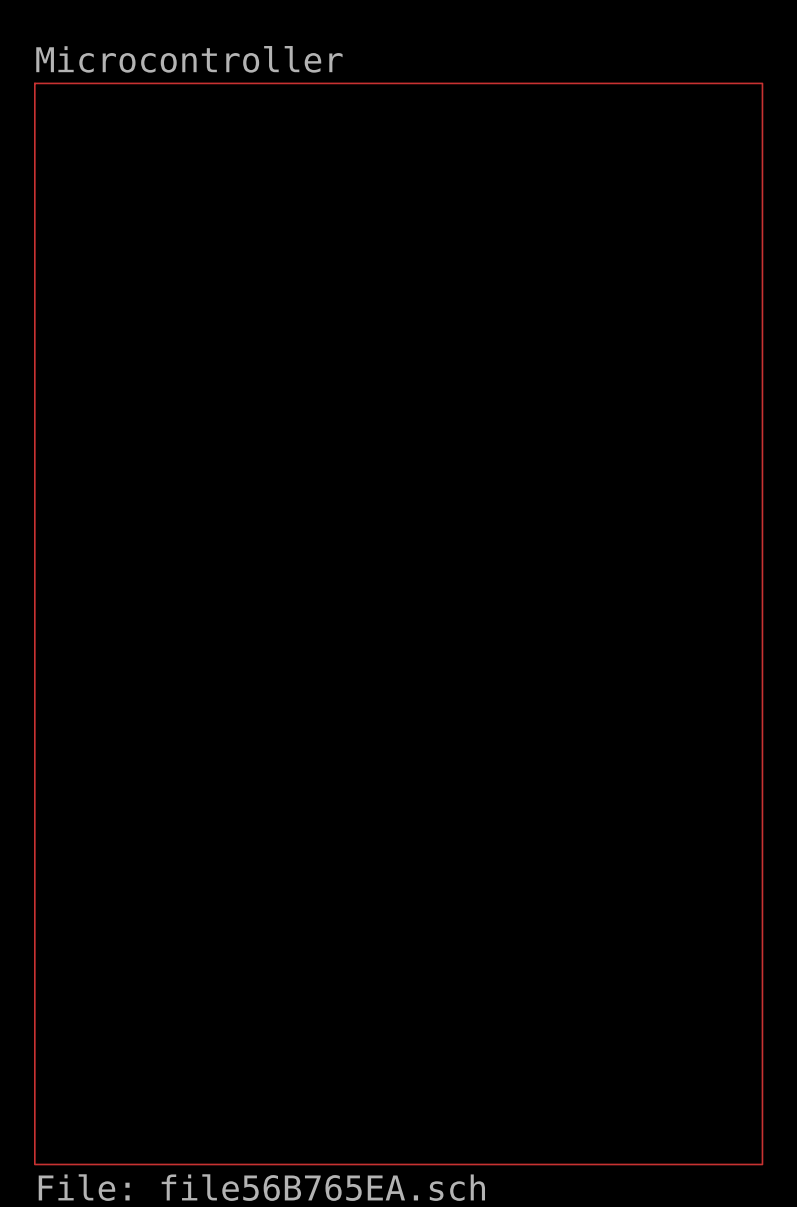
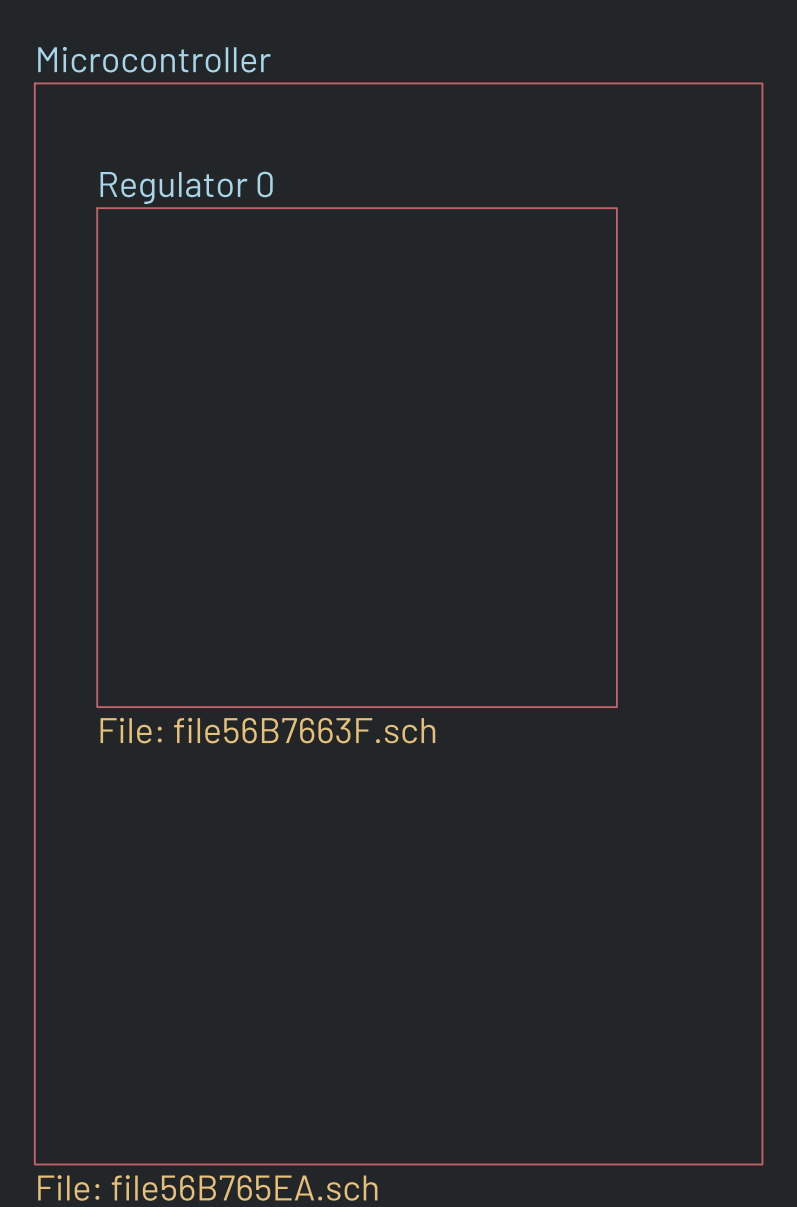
sheet Regulator 0: none -> File: file56B7663F.sch (357, 457)

